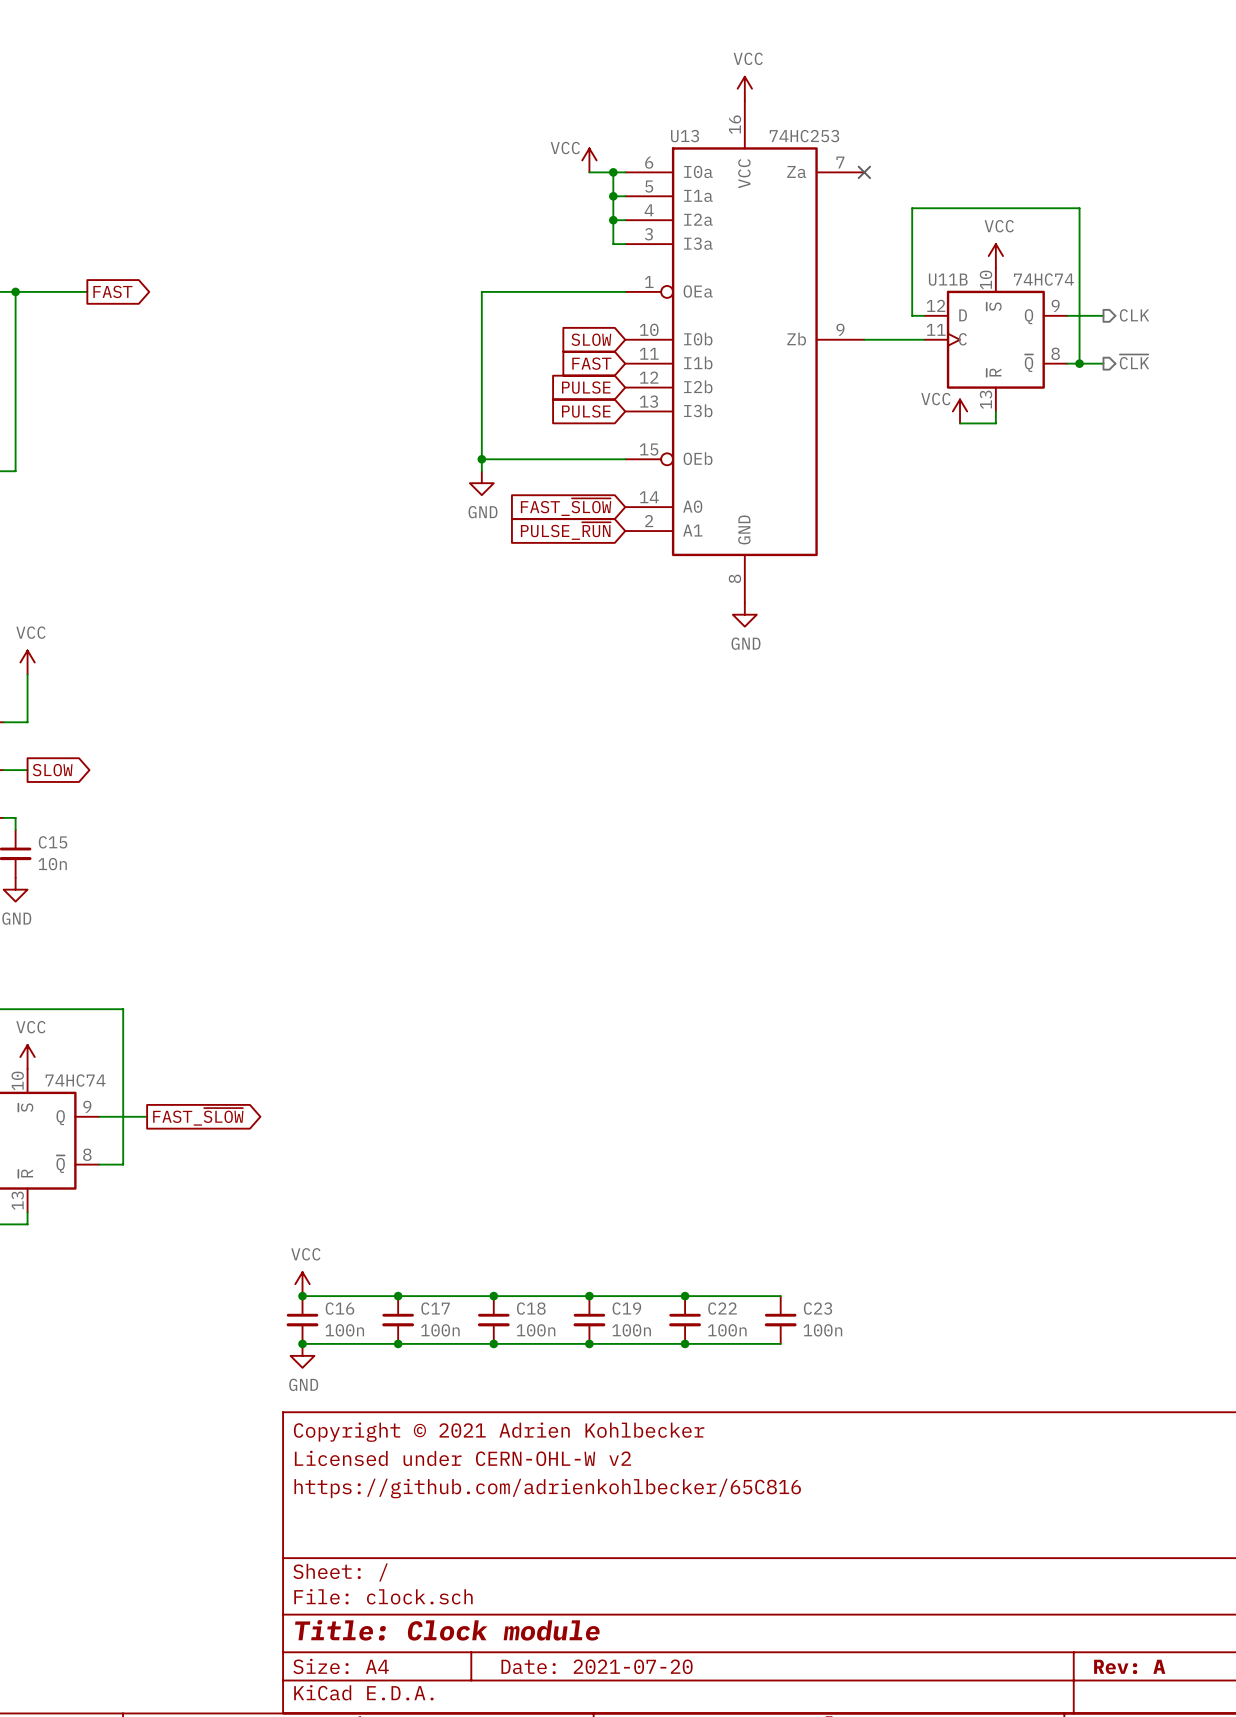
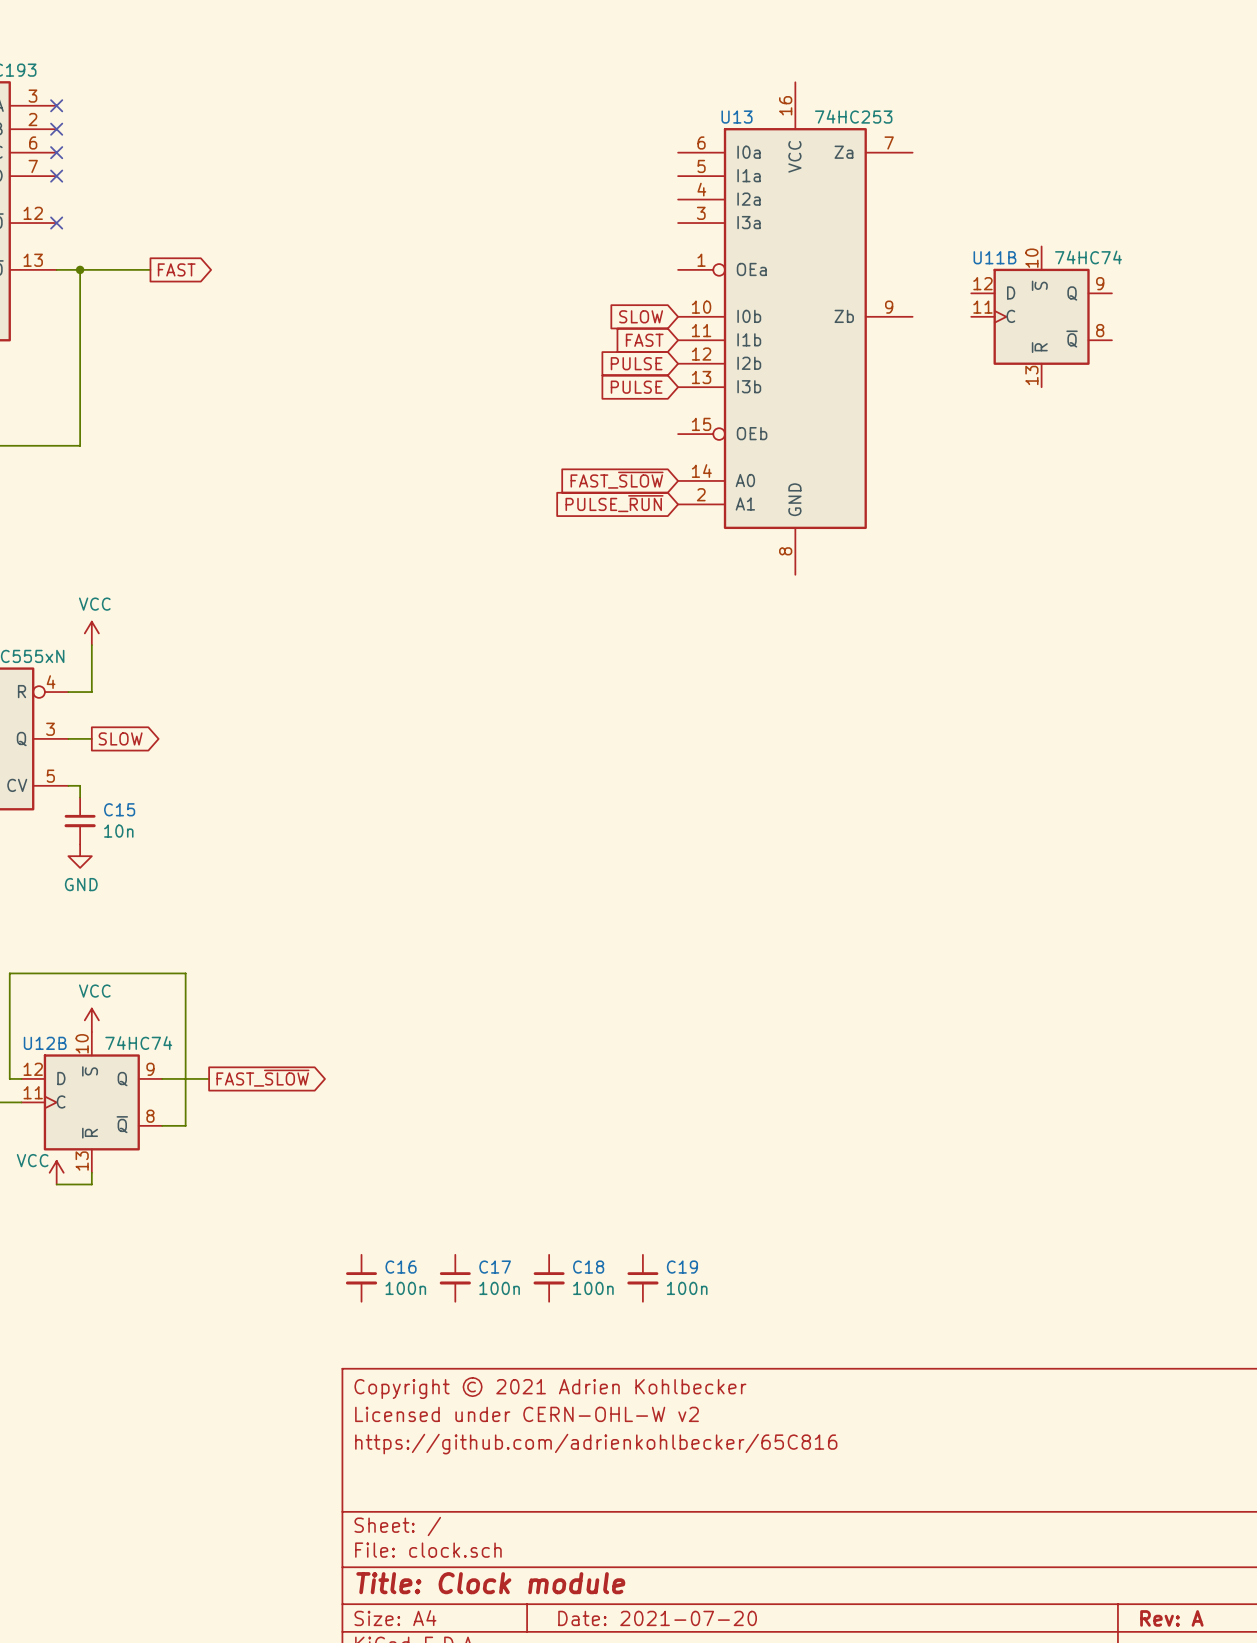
power symbol: VCC (744, 88) -> none
power symbol: VCC (589, 160) -> none
wire: (589, 172) (625, 172) -> none
wire: (613, 172) (613, 244) (625, 244) -> none
junction: (613, 172) -> none
no-connect mark: (864, 172) -> none
wire: (613, 196) (625, 196) -> none
junction: (613, 196) -> none
wire: (613, 220) (625, 220) -> none
junction: (613, 220) -> none
power symbol: VCC (995, 256) -> none
wire: (625, 291) (481, 291) (481, 471) -> none
wire: (924, 315) (912, 315) (912, 208) (1079, 208) (1079, 363) -> none
wire: (1067, 315) (1103, 315) -> none
hierarchical label: CLK (1134, 315) -> none
wire: (864, 339) (924, 339) -> none
hierarchical label: ~{CLK} (1134, 361) -> none
wire: (1067, 363) (1103, 363) -> none
junction: (1079, 363) -> none
power symbol: VCC (960, 411) -> none
wire: (995, 411) (995, 423) (960, 423) -> none
wire: (481, 459) (625, 459) -> none
junction: (481, 459) -> none
power symbol: GND (481, 483) -> none
power symbol: GND (744, 614) -> none
power symbol: VCC (302, 1284) -> none
wire: (302, 1296) (780, 1296) -> none
junction: (302, 1296) -> none
junction: (398, 1296) -> none
junction: (493, 1296) -> none
junction: (589, 1296) -> none
junction: (685, 1296) -> none
C22: 100n (685, 1320) -> none
C23: 100n (780, 1320) -> none
wire: (302, 1343) (780, 1343) -> none
junction: (302, 1343) -> none
junction: (398, 1343) -> none
junction: (493, 1343) -> none
junction: (589, 1343) -> none
junction: (685, 1343) -> none
power symbol: GND (302, 1355) -> none

